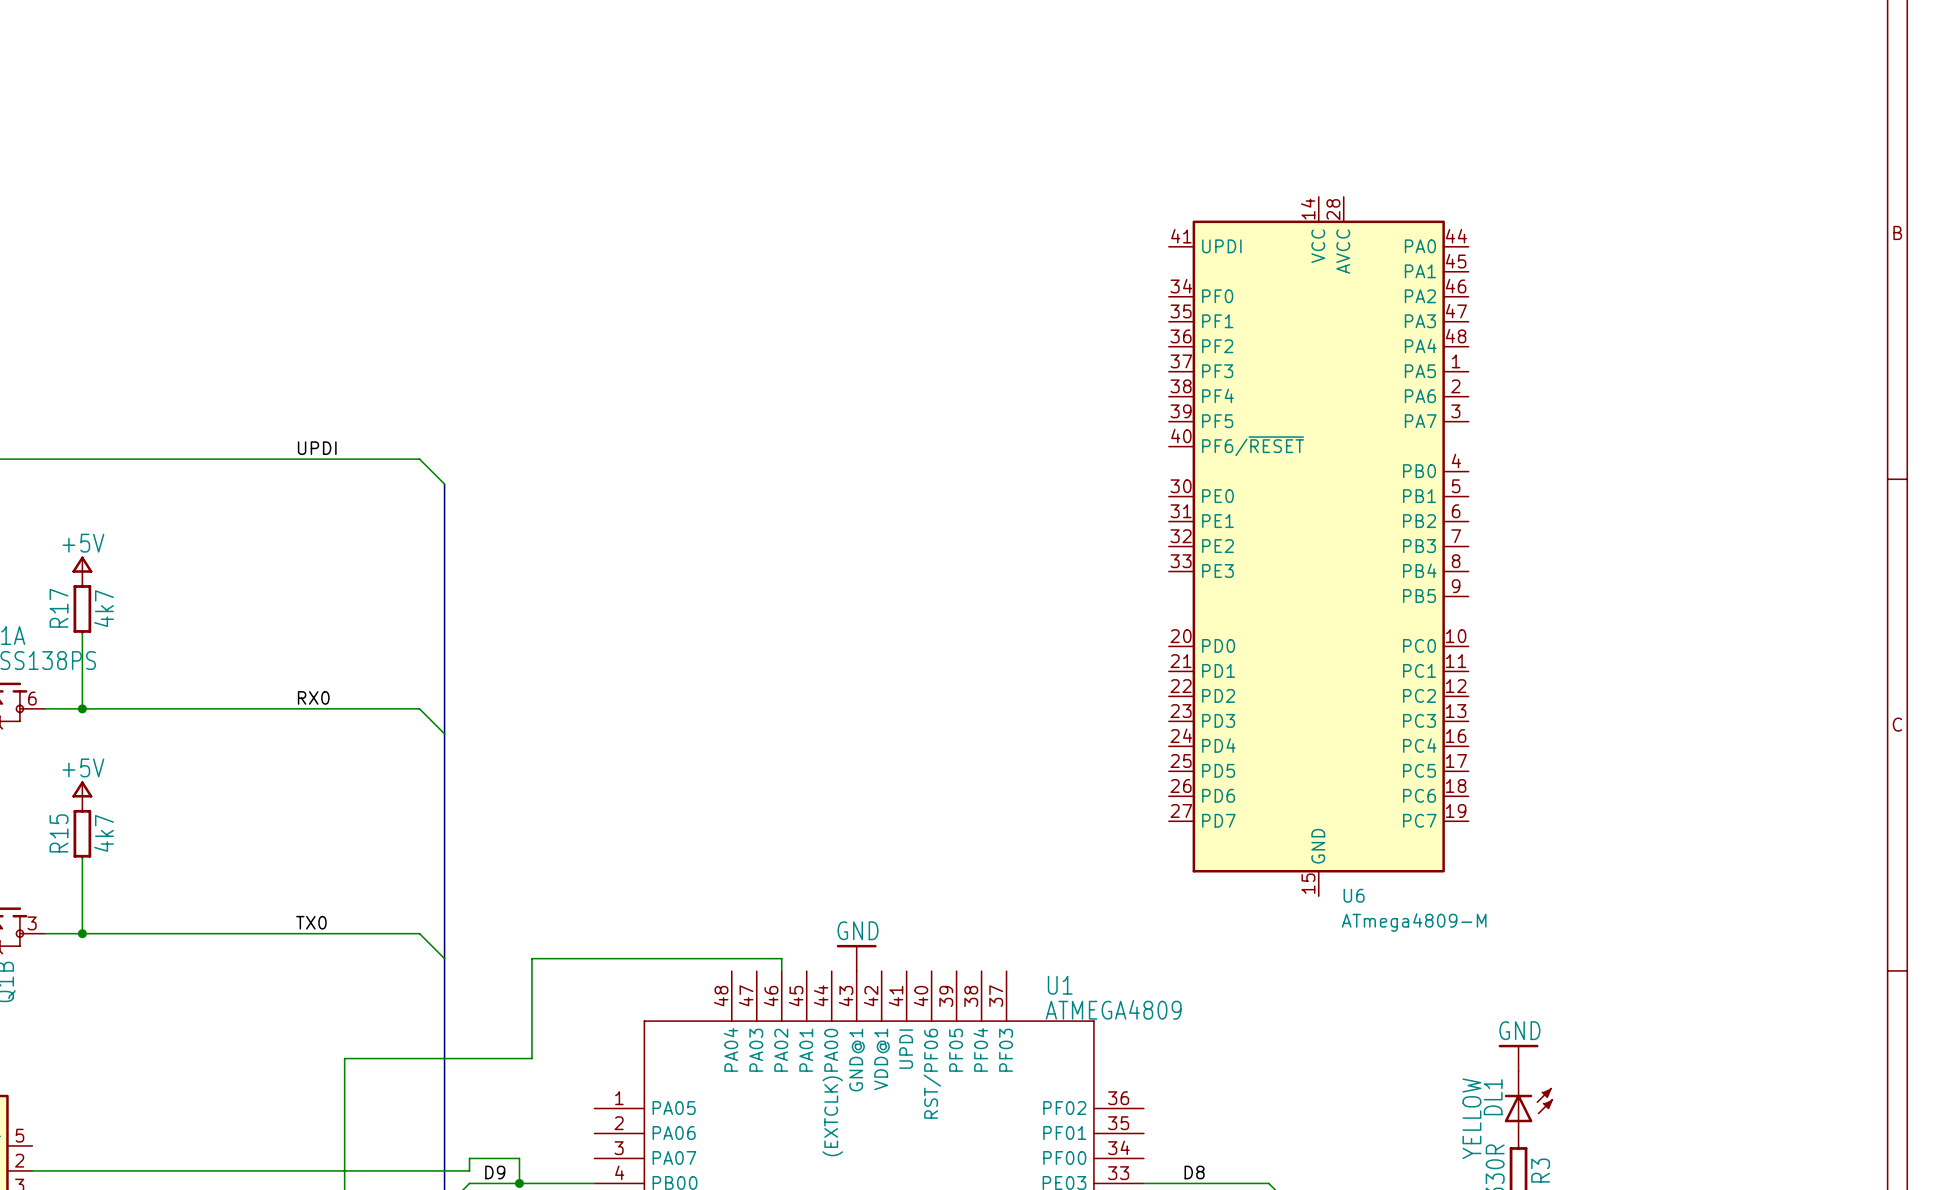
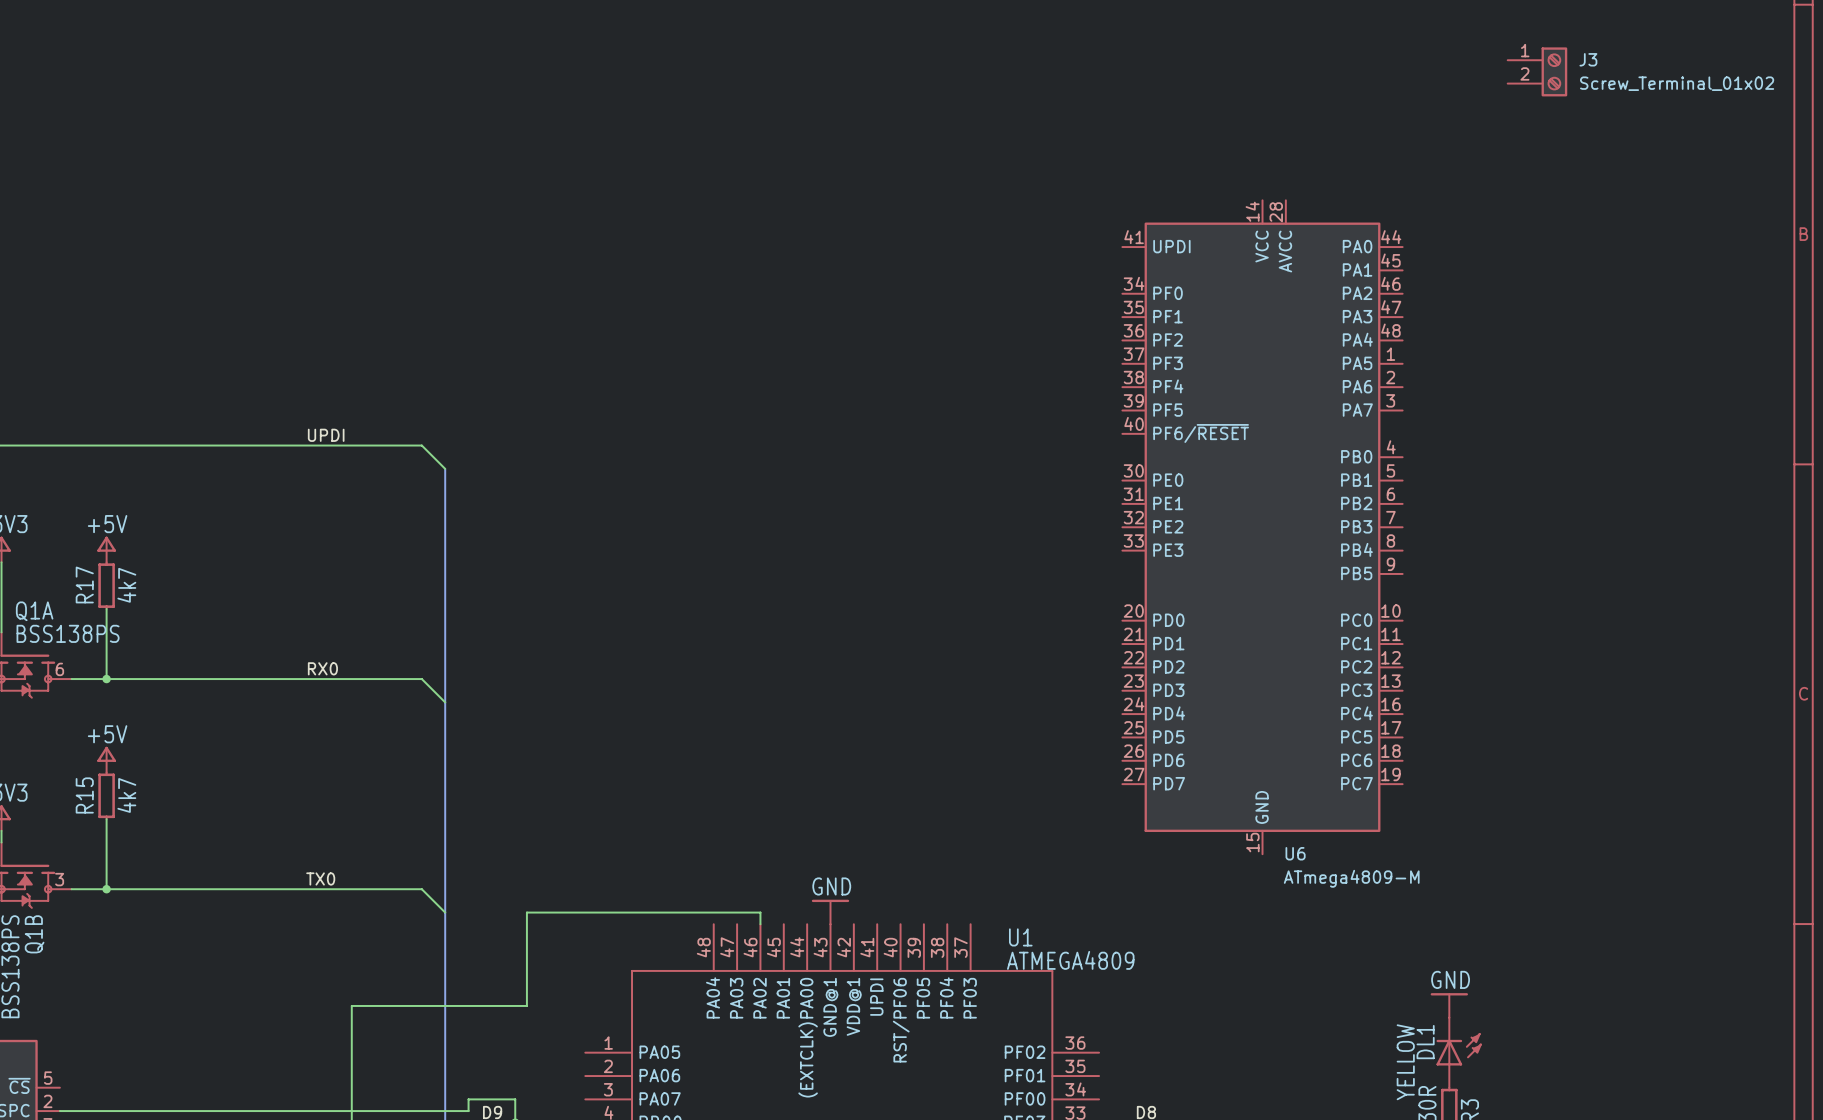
J3: none -> Screw_Terminal_01x02 (1537, 71)

